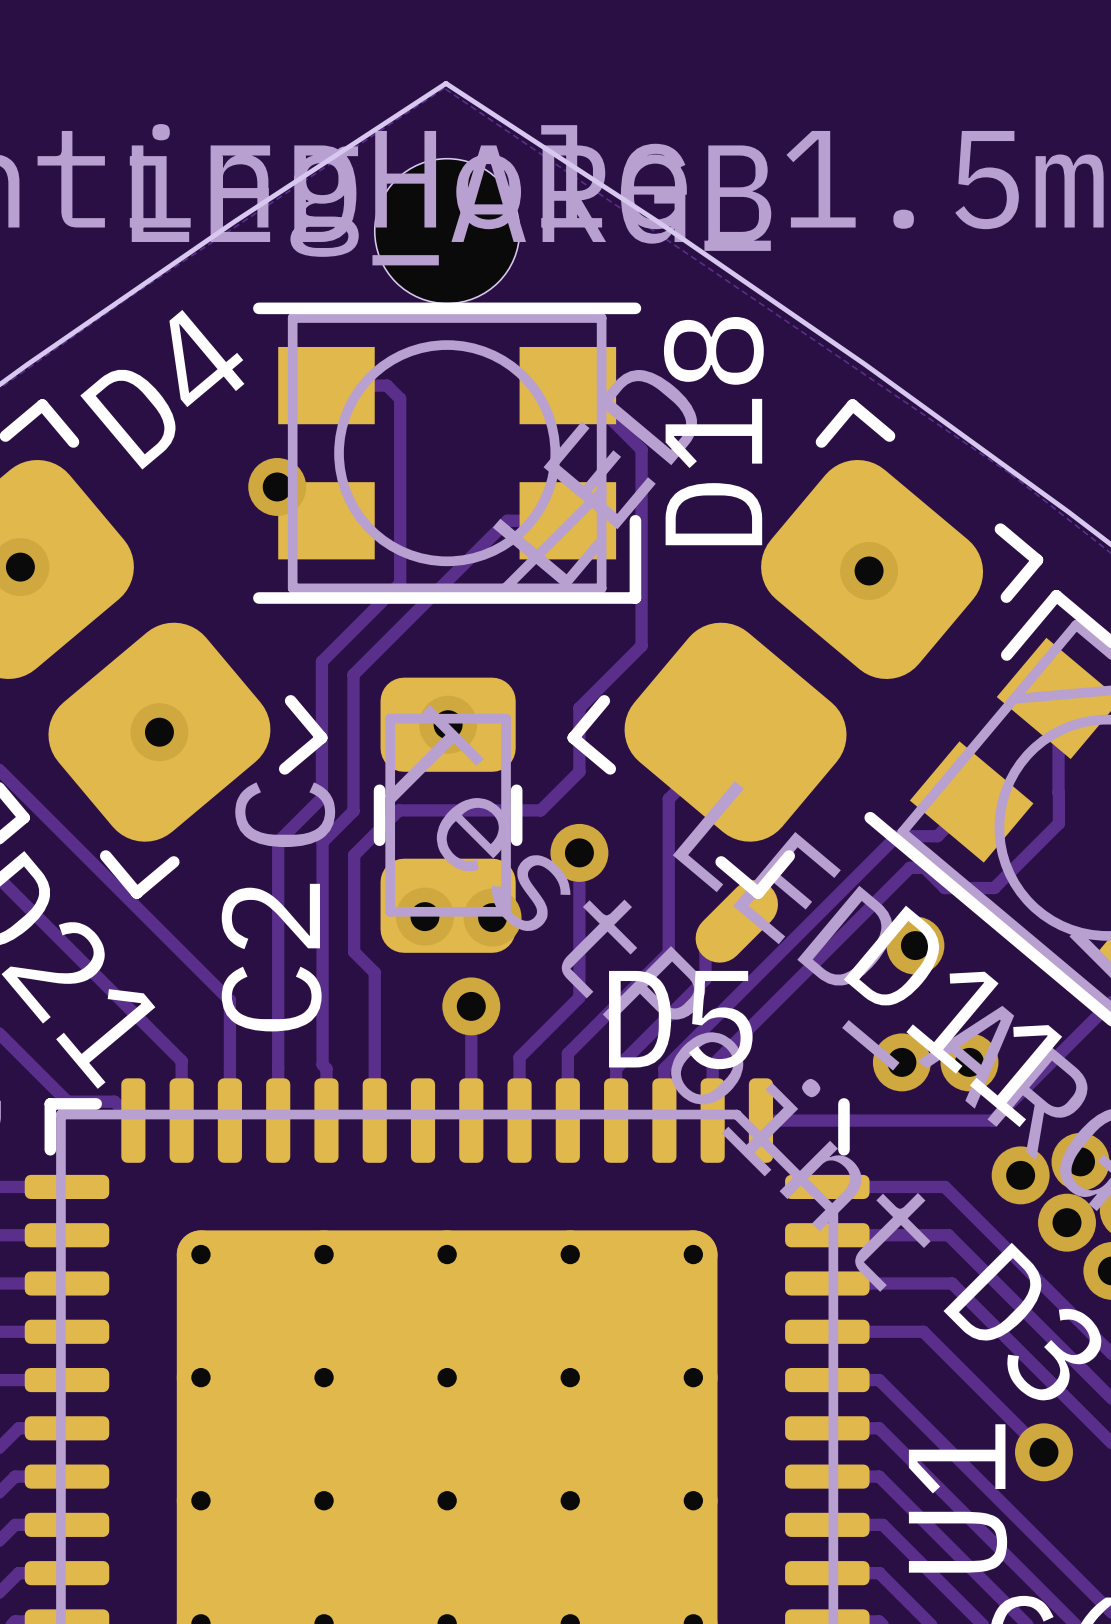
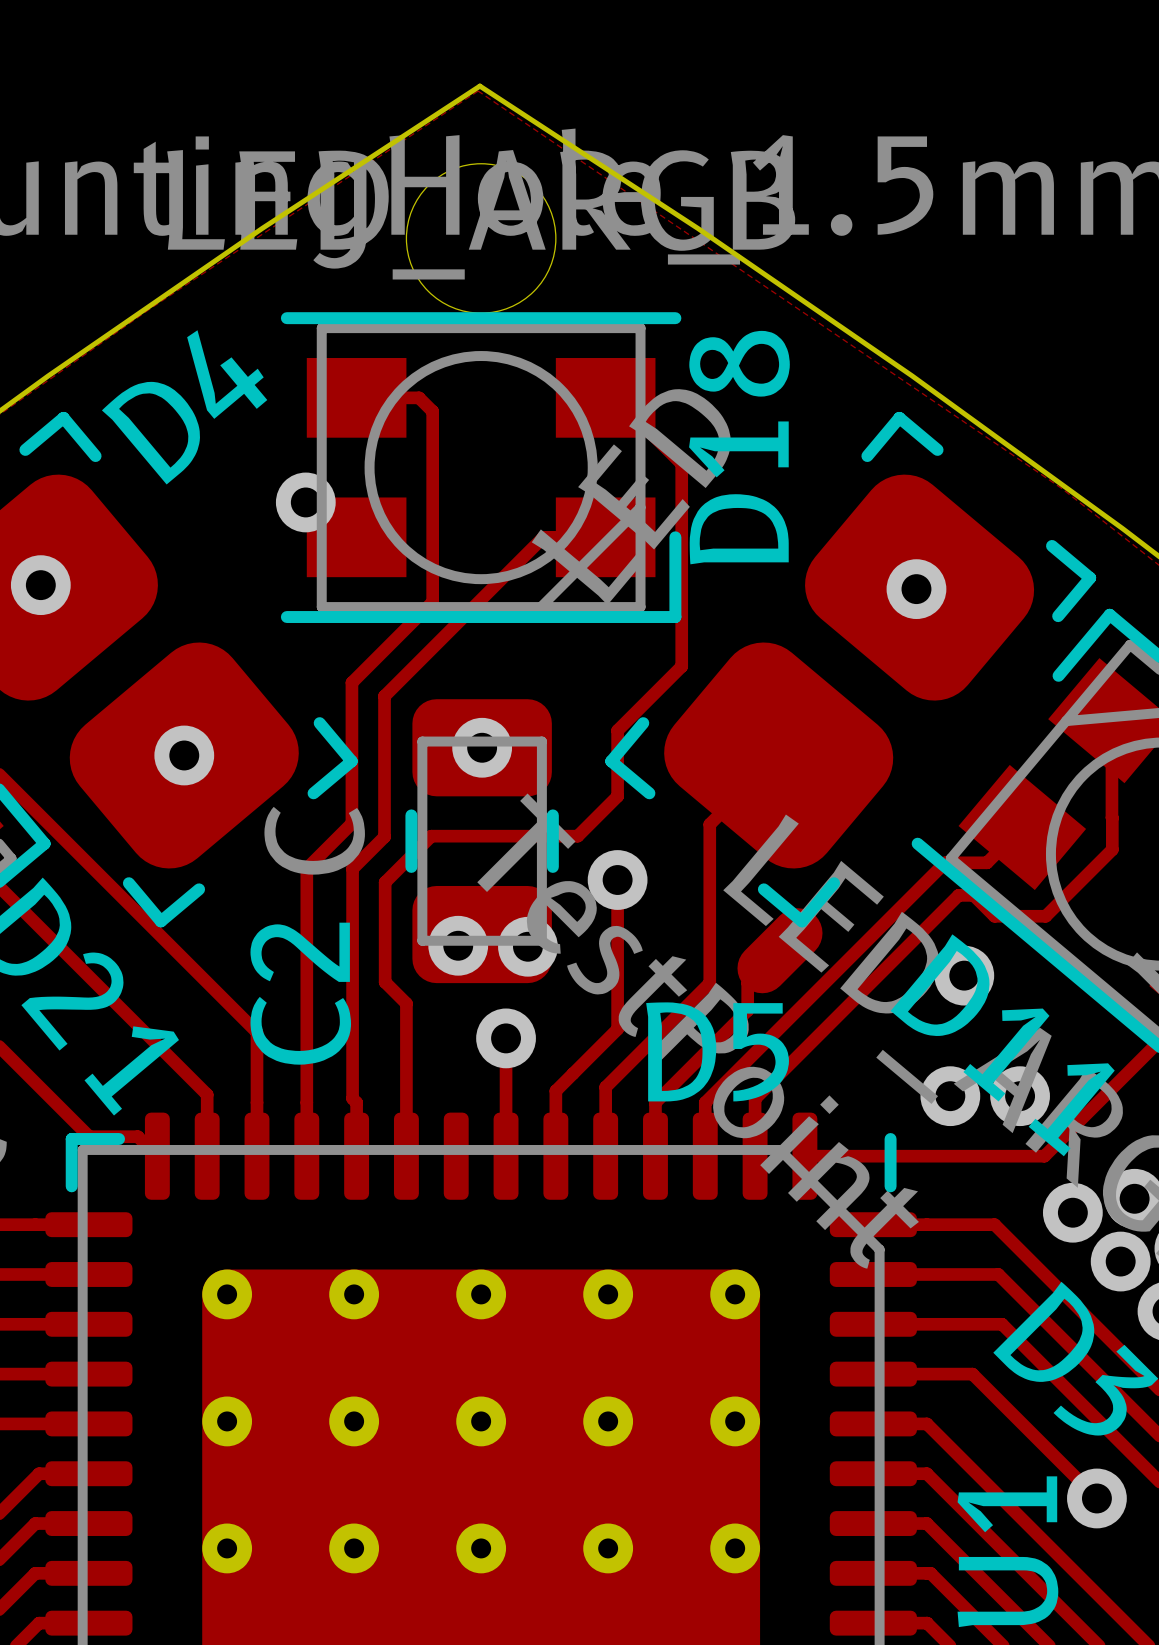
D18 name position: D18 (713, 431) -> D18 (739, 447)

